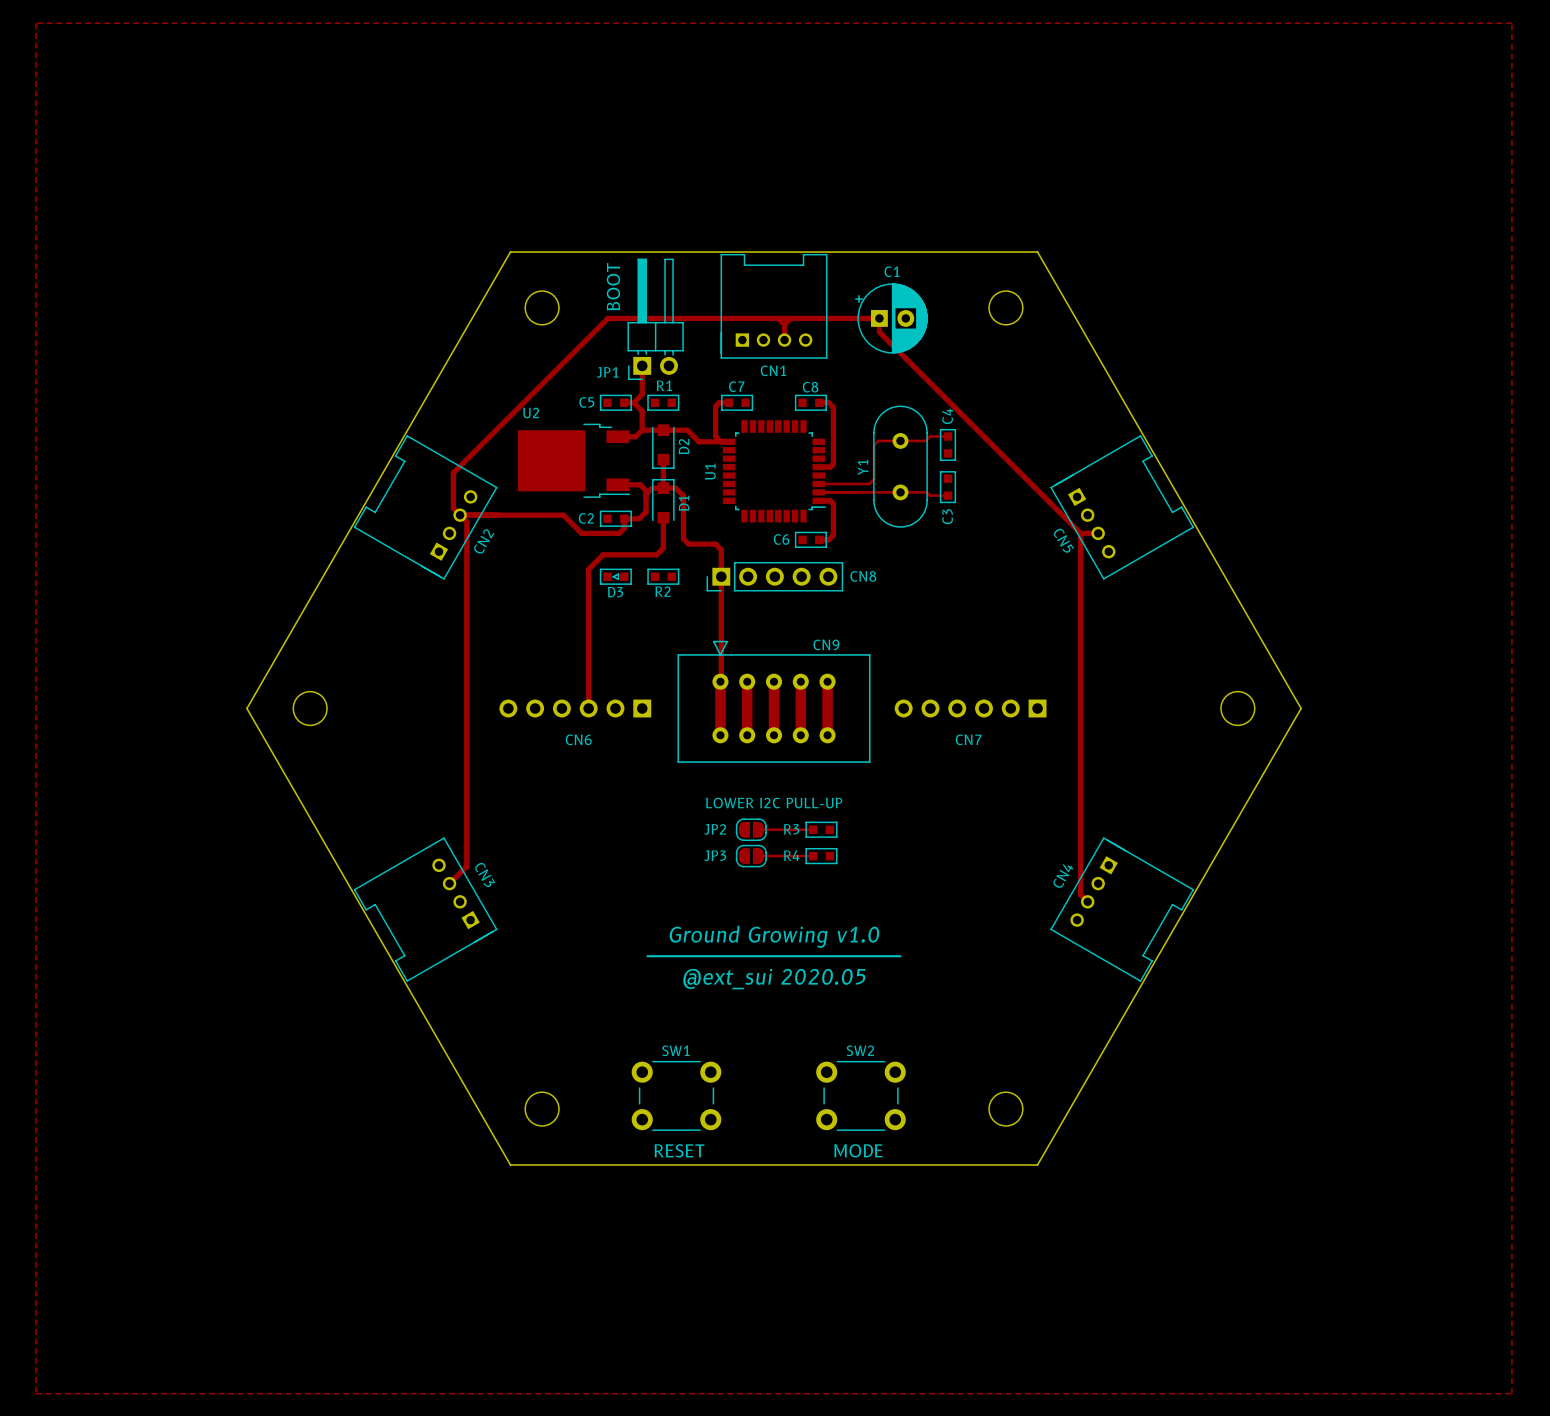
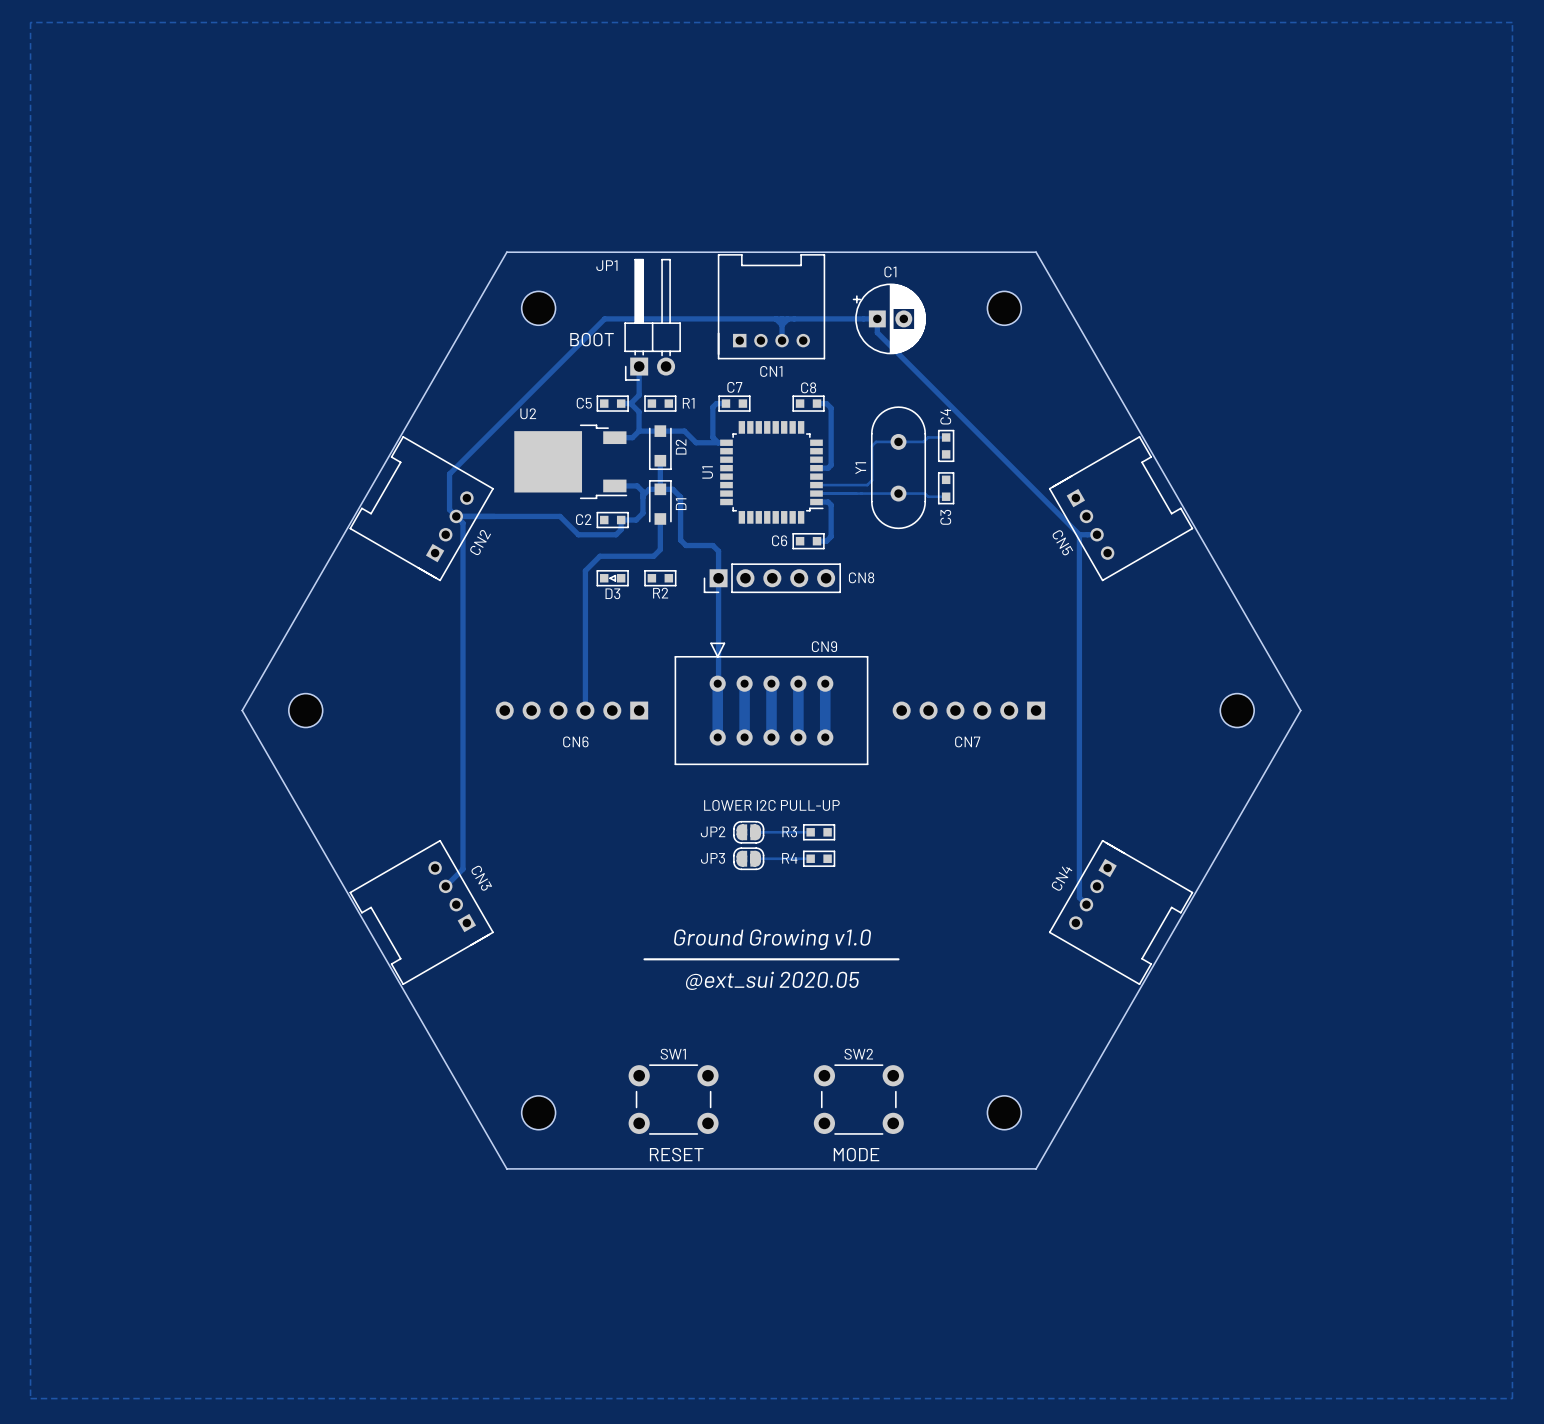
text rotation: 0° (613, 286) -> 90° clockwise (592, 339)
JP1 name position: JP1 (607, 372) -> JP1 (606, 265)
R1 name position: R1 (664, 385) -> R1 (688, 403)

